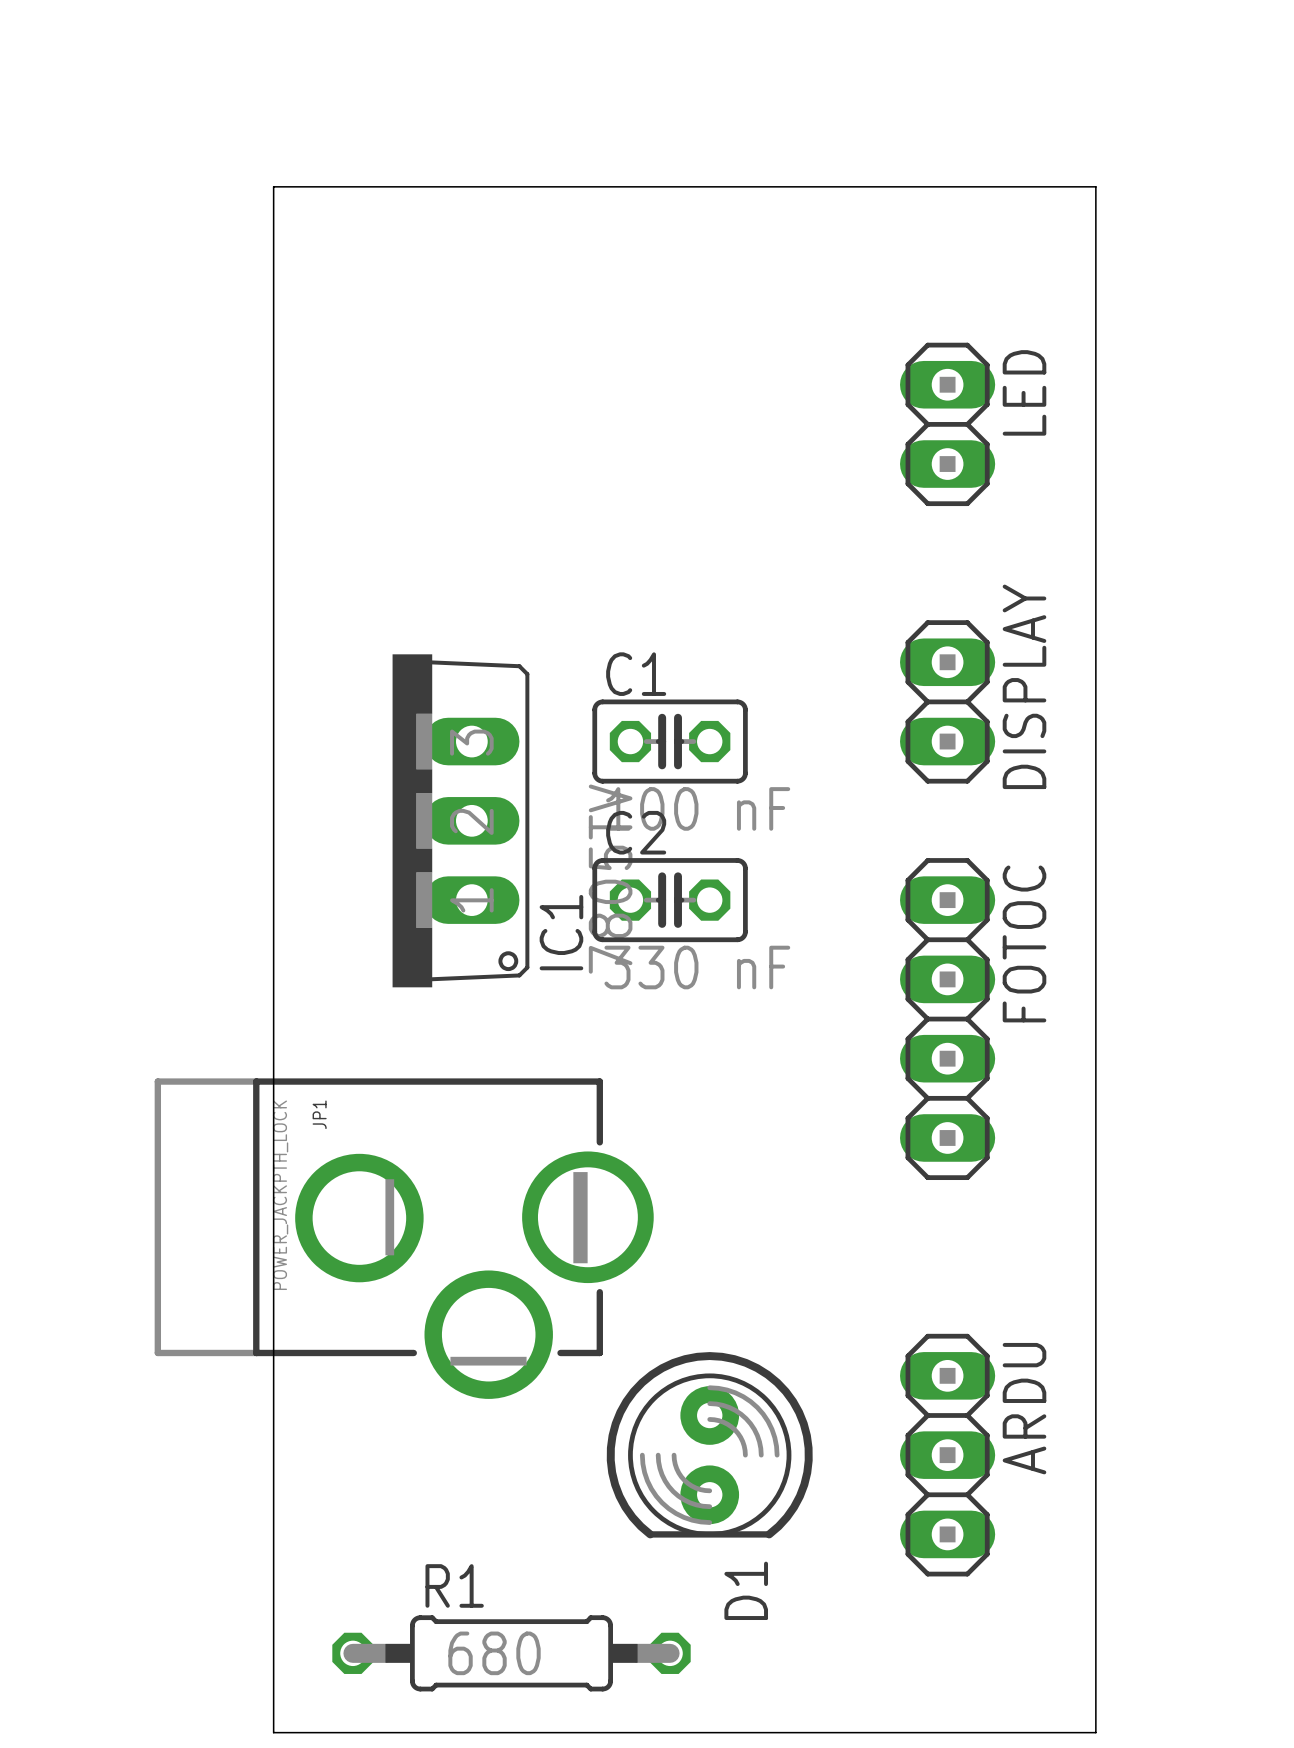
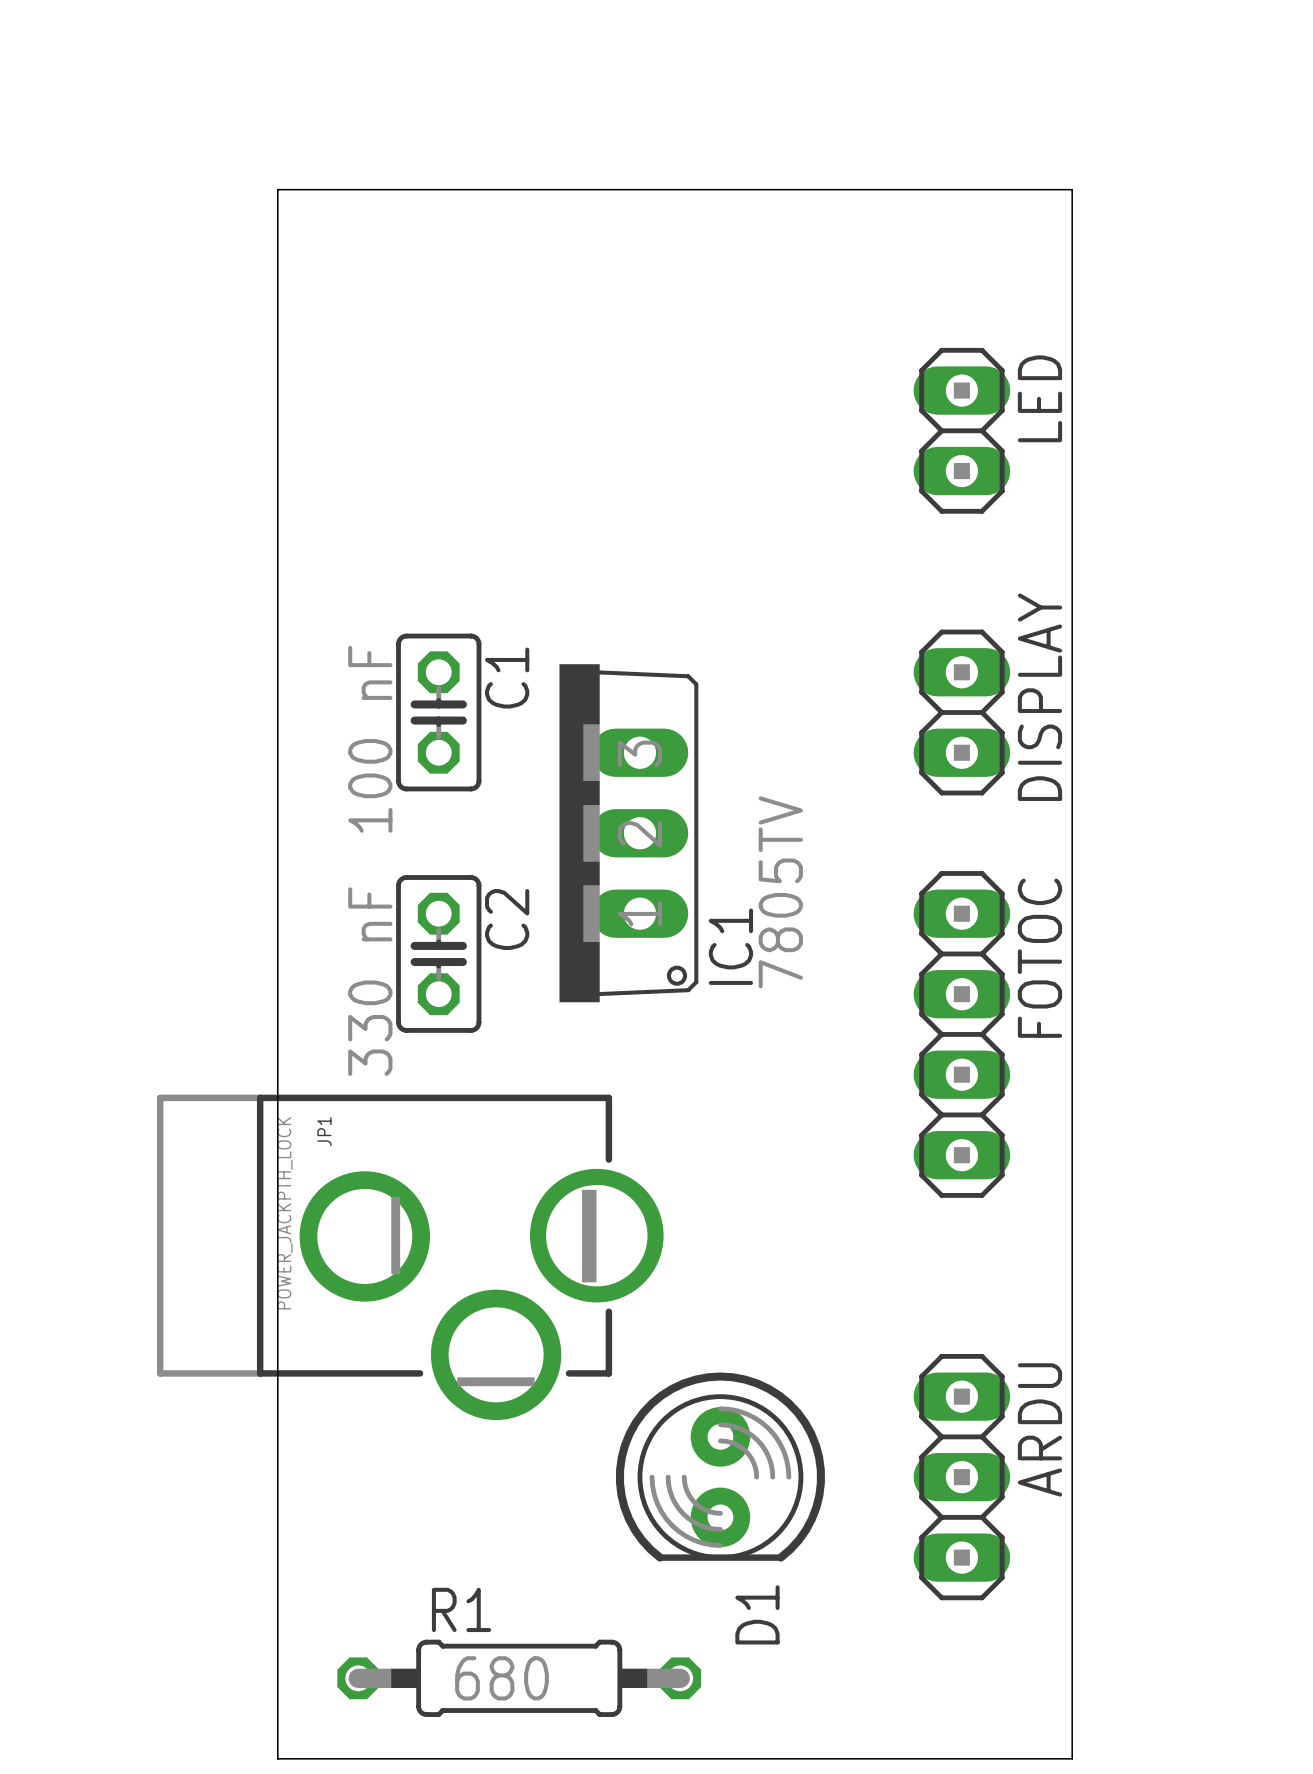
board edge: (1056, 186) (1095, 186) (1095, 1732) (1056, 1732) -> (1072, 189) (1072, 1758)
C1 rotation: 0° (670, 741) -> 90° clockwise (438, 712)
C1 position: (670, 741) -> (438, 712)
IC1 position: (460, 820) -> (628, 833)
C2 rotation: 0° (670, 900) -> 90° clockwise (438, 953)
C2 position: (670, 900) -> (438, 953)

